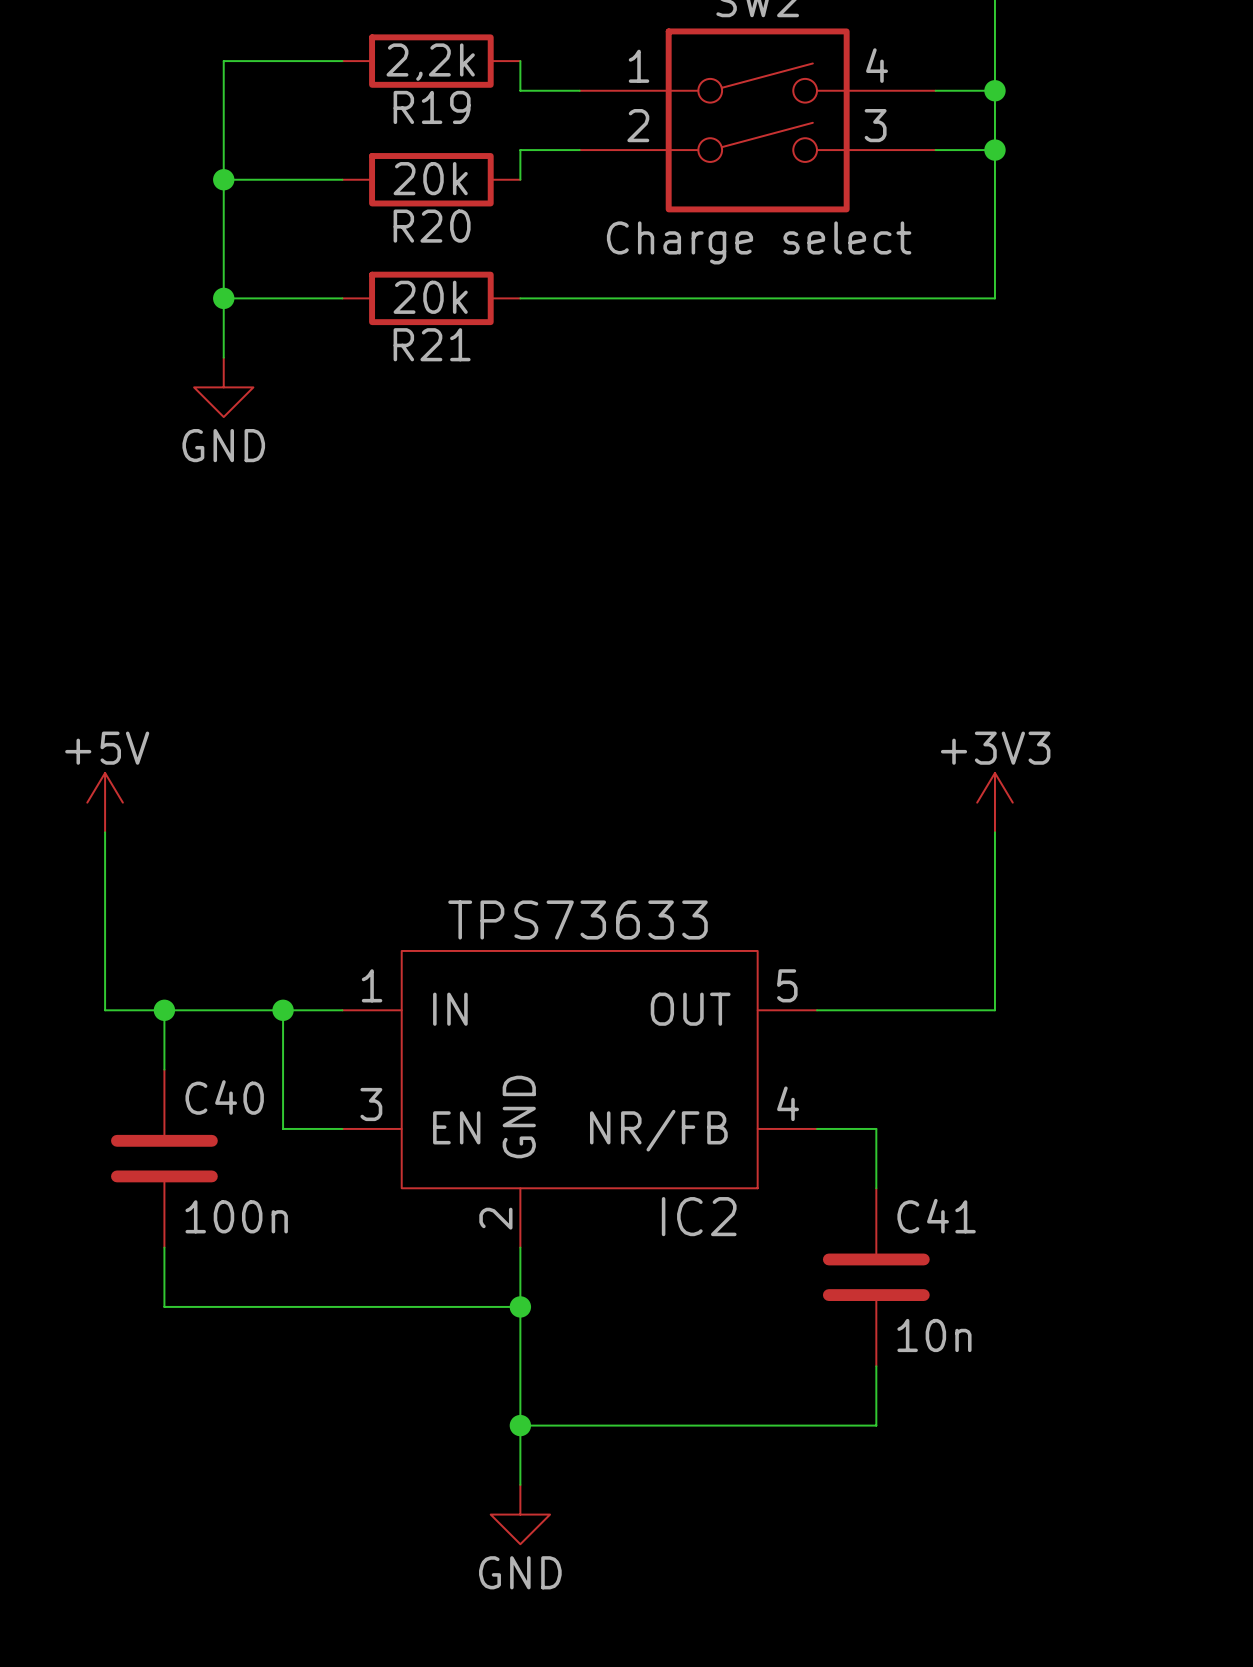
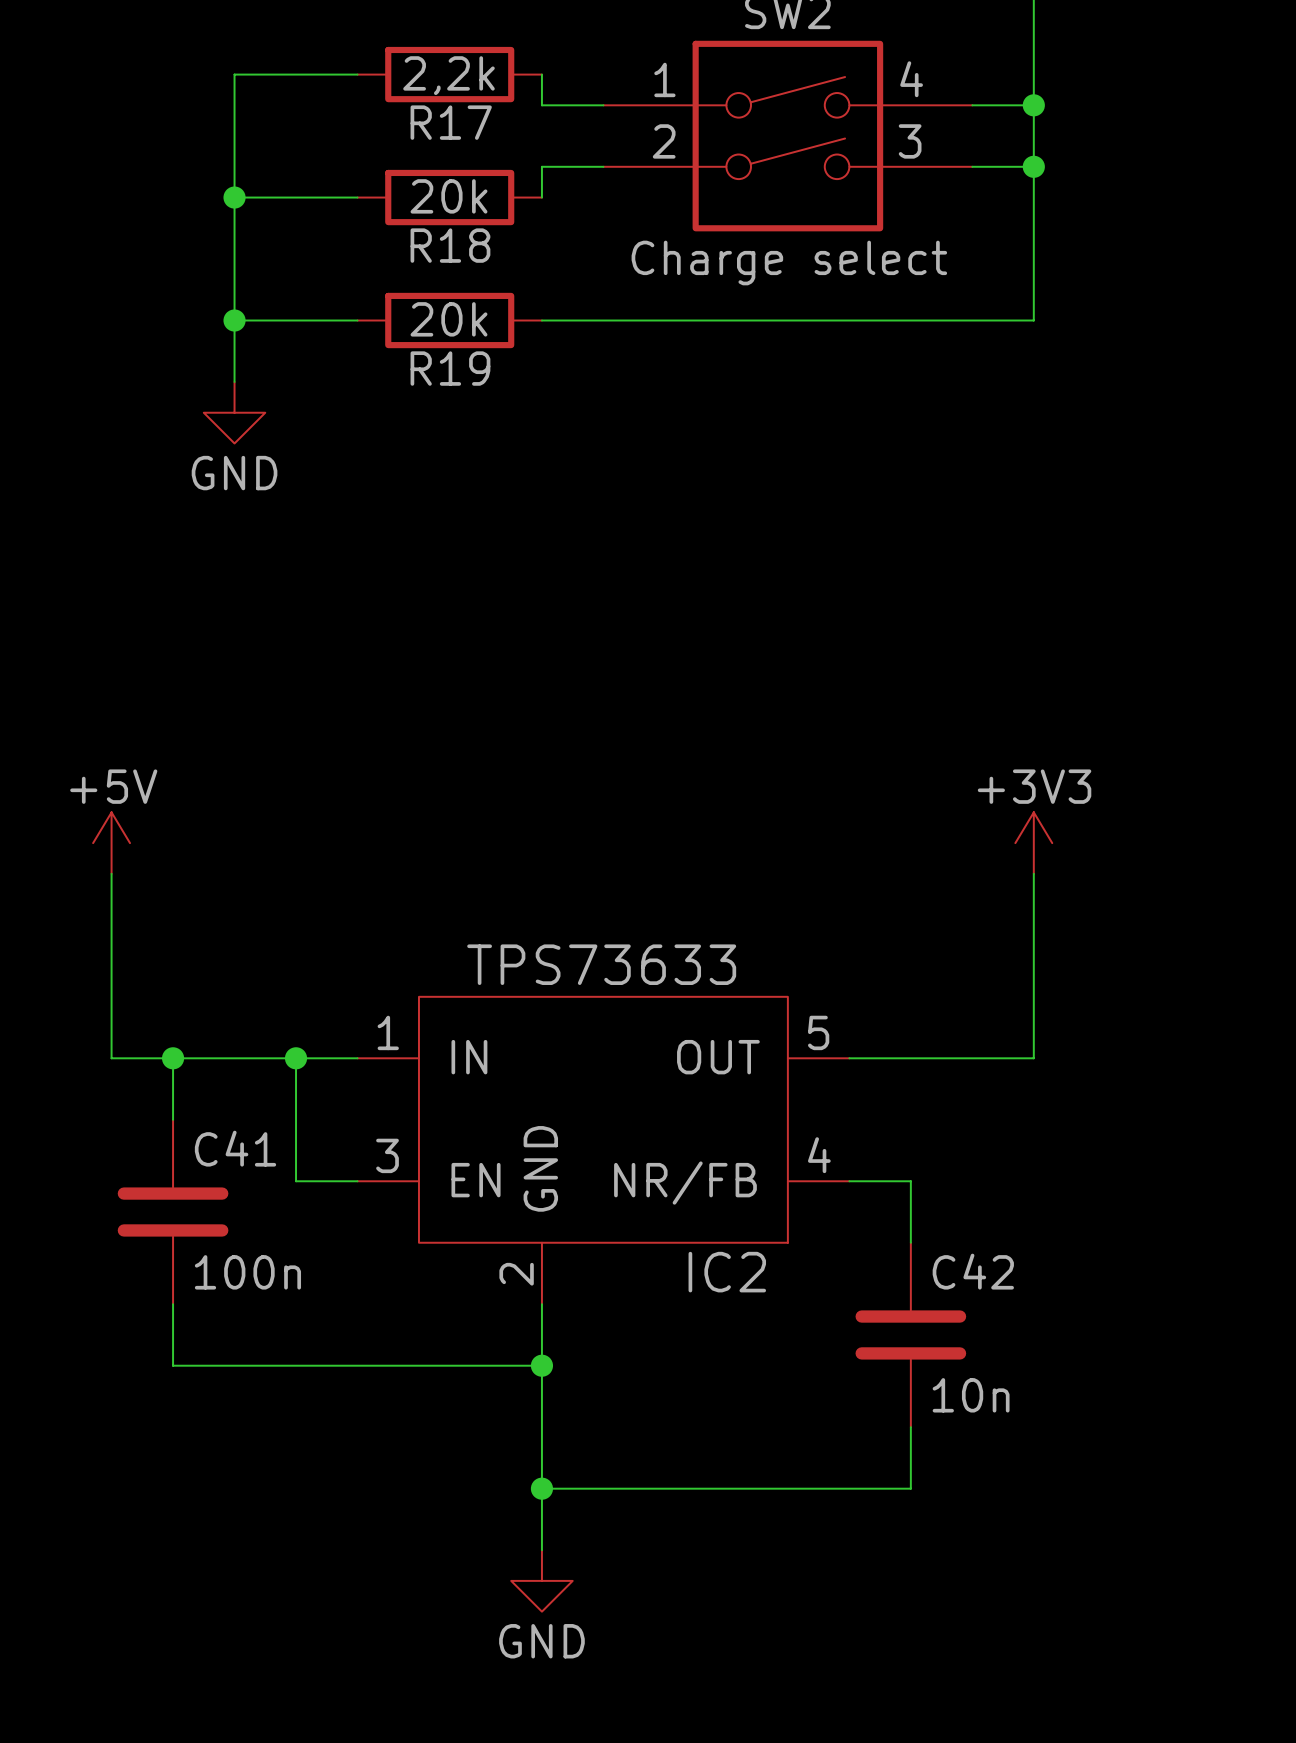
R19 name: R19 (432, 107) -> R17 (451, 122)
R20 name: R20 (432, 226) -> R18 (450, 245)
R21 name: R21 (432, 344) -> R19 (450, 368)
C40 name: C40 (224, 1097) -> C41 (235, 1148)
C41 name: C41 (936, 1216) -> C42 (973, 1271)

